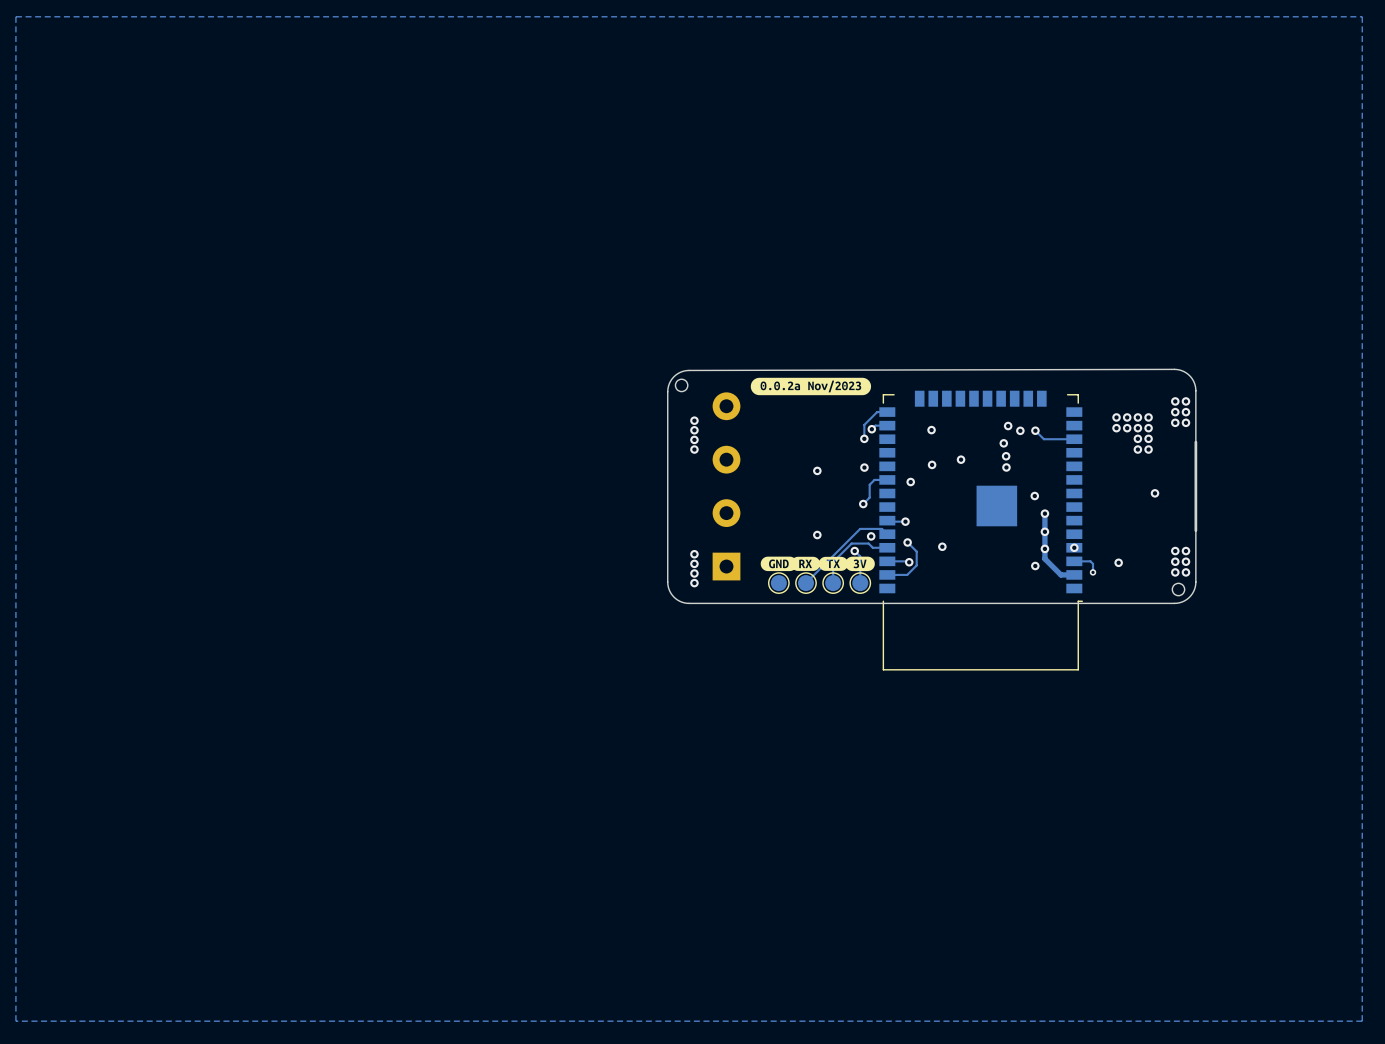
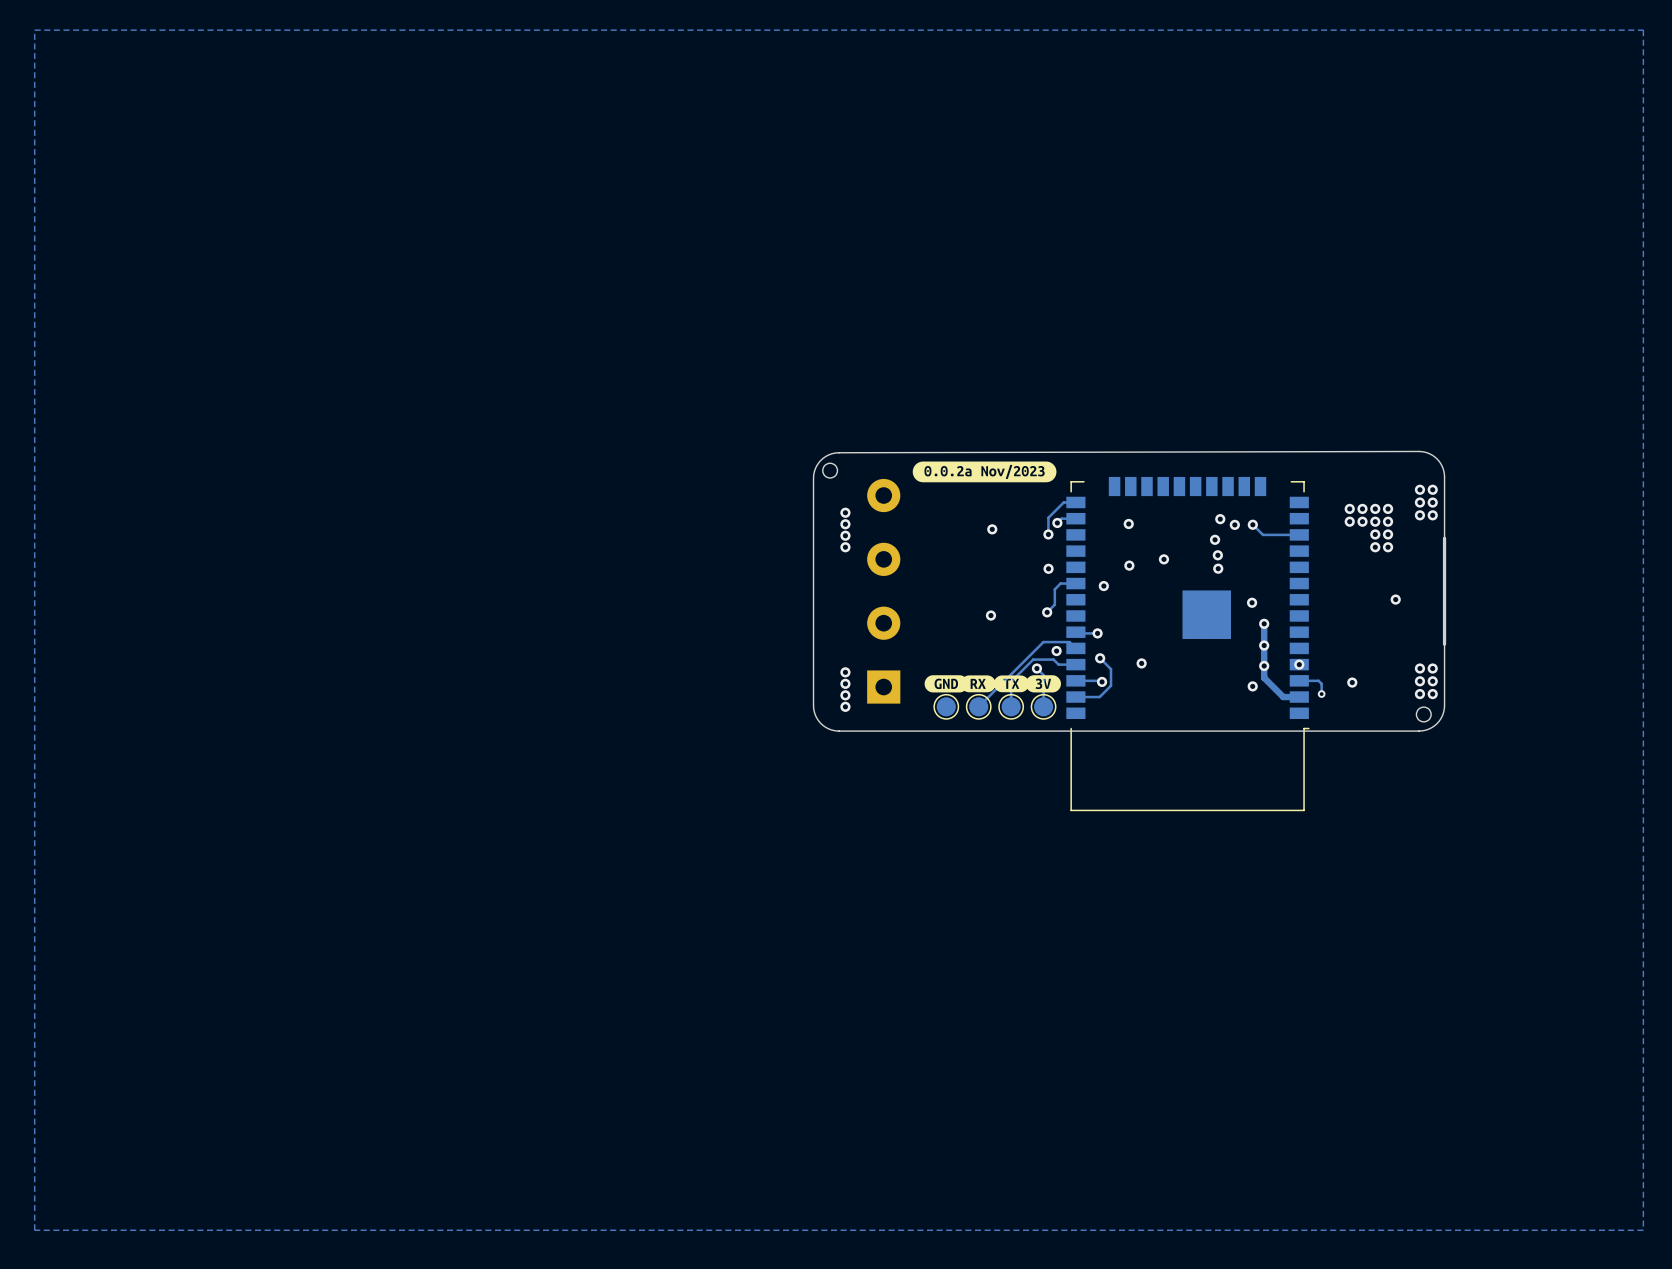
via: none -> (992, 529)
via: (817, 470) -> none
via: none -> (990, 615)
via: (817, 535) -> none

